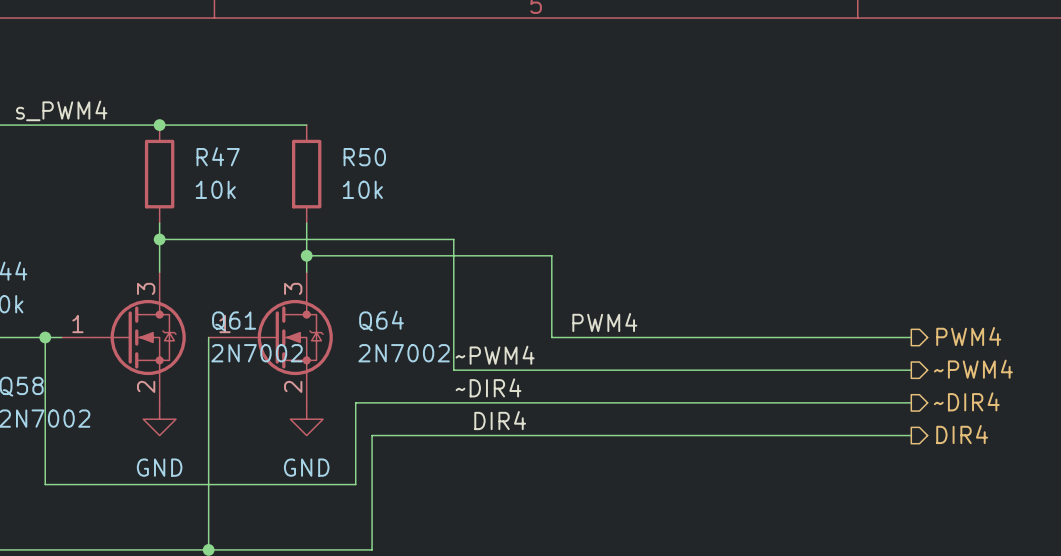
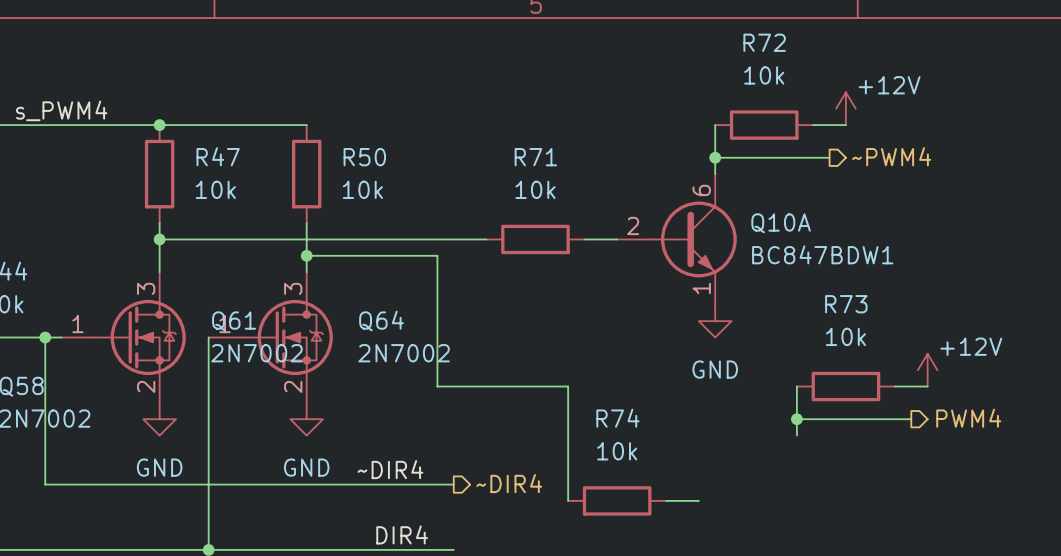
power symbol: none -> +12V (845, 108)
wire: none -> (715, 125) (715, 174)
R72: none -> 10k (764, 125)
wire: none -> (813, 125) (845, 125)
wire: none -> (715, 157) (829, 157)
junction: none -> (715, 157)
wire: (453, 239) (453, 370) (911, 370) -> (453, 239) (486, 239)
R71: none -> 10k (535, 239)
wire: none -> (584, 239) (617, 239)
Q10A: none -> BC847BDW1 (676, 239)
wire: (437, 255) (551, 255) (551, 337) (911, 337) -> (437, 255) (437, 386) (568, 386) (568, 500)
power symbol: none -> GND (715, 321)
label: PWM4 (604, 322) -> none
hierarchical label position: PWM4 (968, 336) -> PWM4 (968, 418)
label: ~PWM4 (495, 355) -> none
hierarchical label position: ~PWM4 (973, 369) -> ~PWM4 (891, 156)
power symbol: none -> +12V (927, 370)
wire: none -> (796, 386) (796, 435)
R73: none -> 10k (845, 386)
wire: none -> (894, 386) (927, 386)
label position: ~DIR4 (488, 387) -> ~DIR4 (390, 469)
hierarchical label: ~DIR4 (966, 401) -> none
wire: (911, 402) (355, 402) (355, 484) -> (453, 484) (355, 484)
wire: none -> (796, 419) (911, 419)
junction: none -> (796, 419)
label position: DIR4 (500, 420) -> DIR4 (402, 534)
hierarchical label: DIR4 (962, 434) -> none
wire: (911, 435) (372, 435) (372, 549) -> (453, 549) (372, 549)
hierarchical label: none -> ~DIR4 (509, 483)
R74: none -> 10k (617, 500)
wire: none -> (666, 500) (698, 500)

